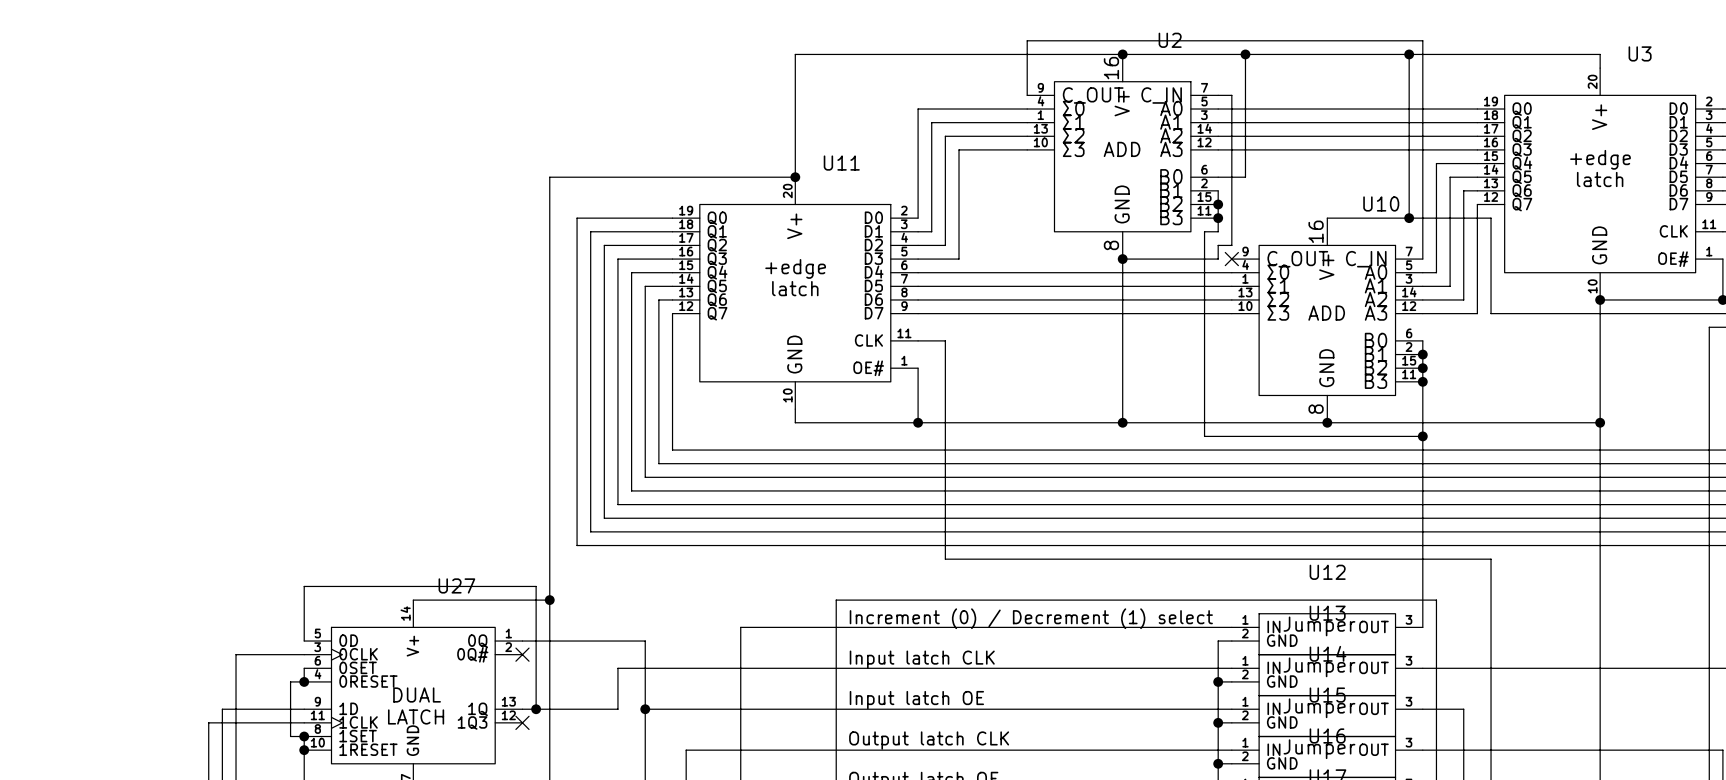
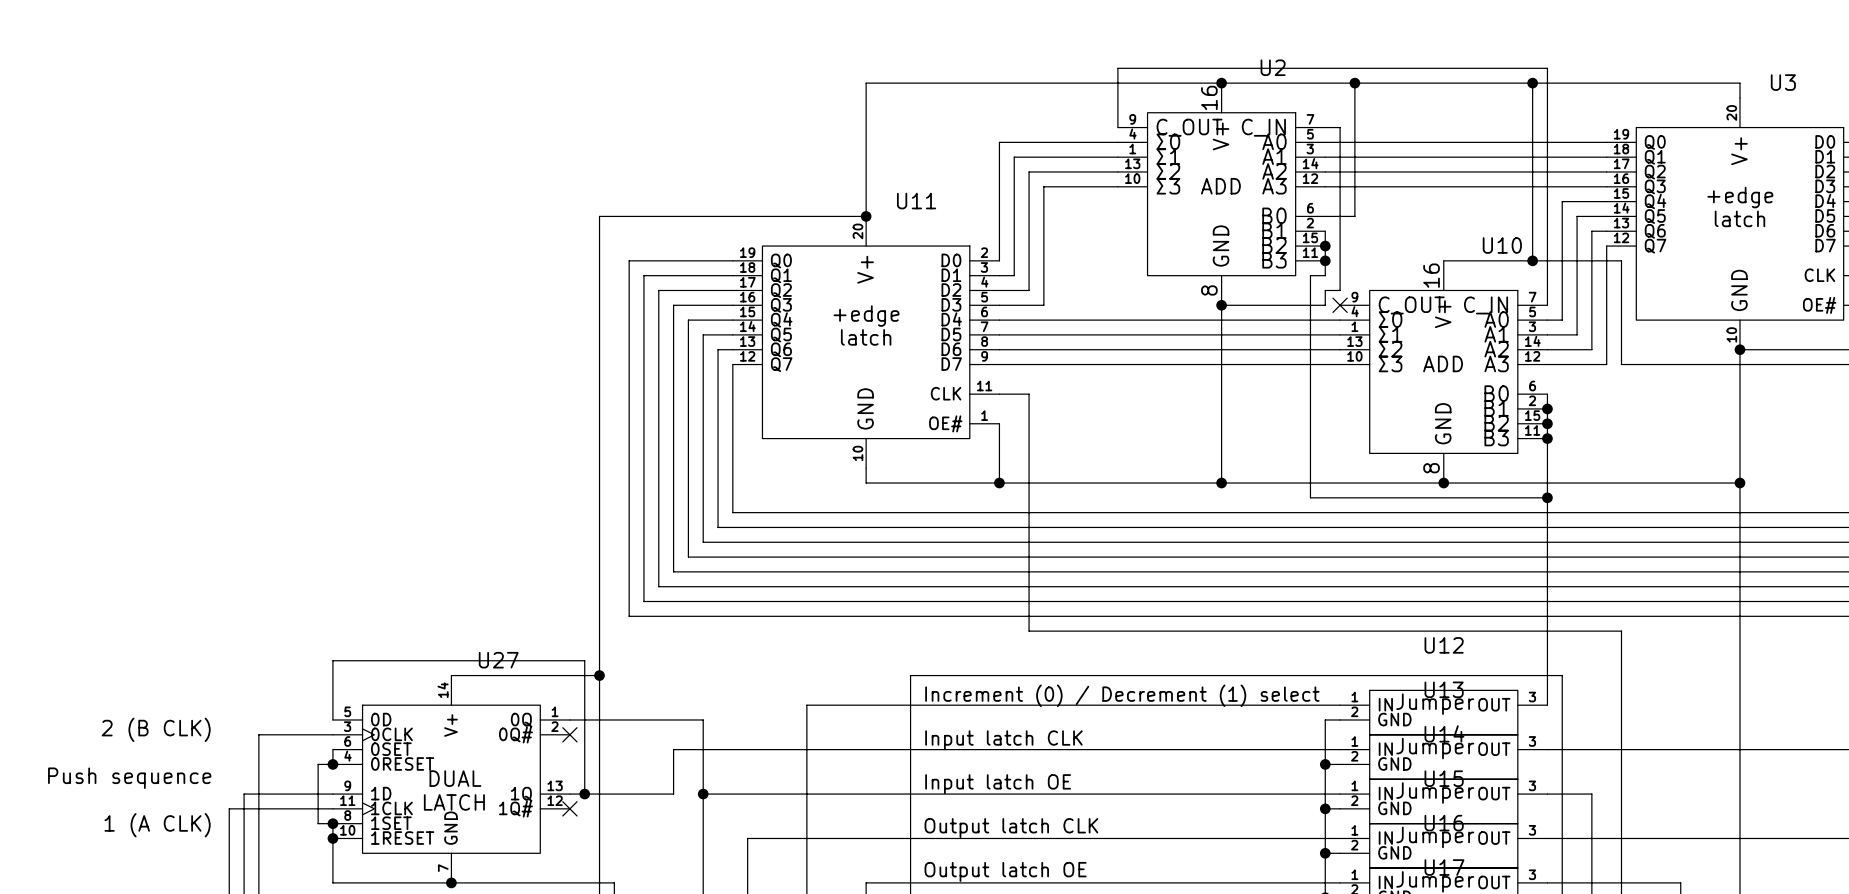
text: none -> 2 (B CLK) (156, 729)
text: none -> Push sequence (129, 778)
U27 pin name: 1Q3 (472, 722) -> 1Q# (515, 808)
text: none -> 1 (A CLK) (157, 825)

